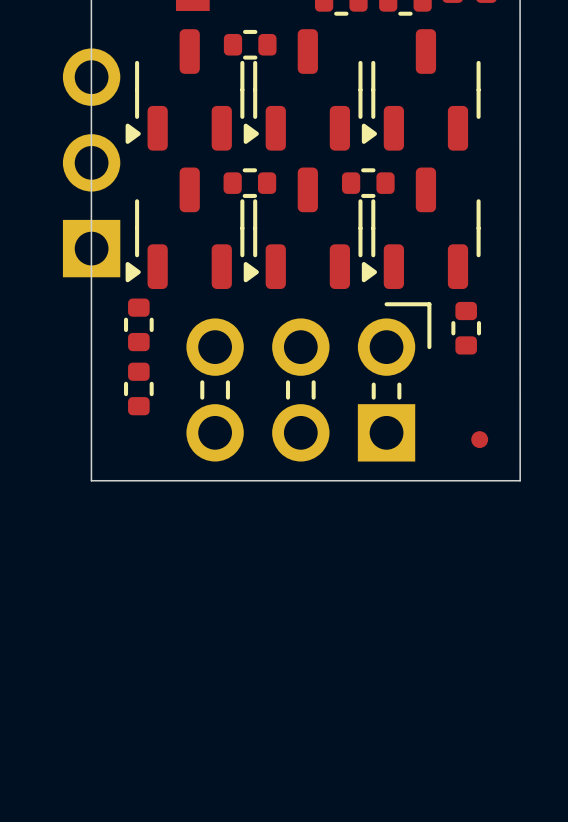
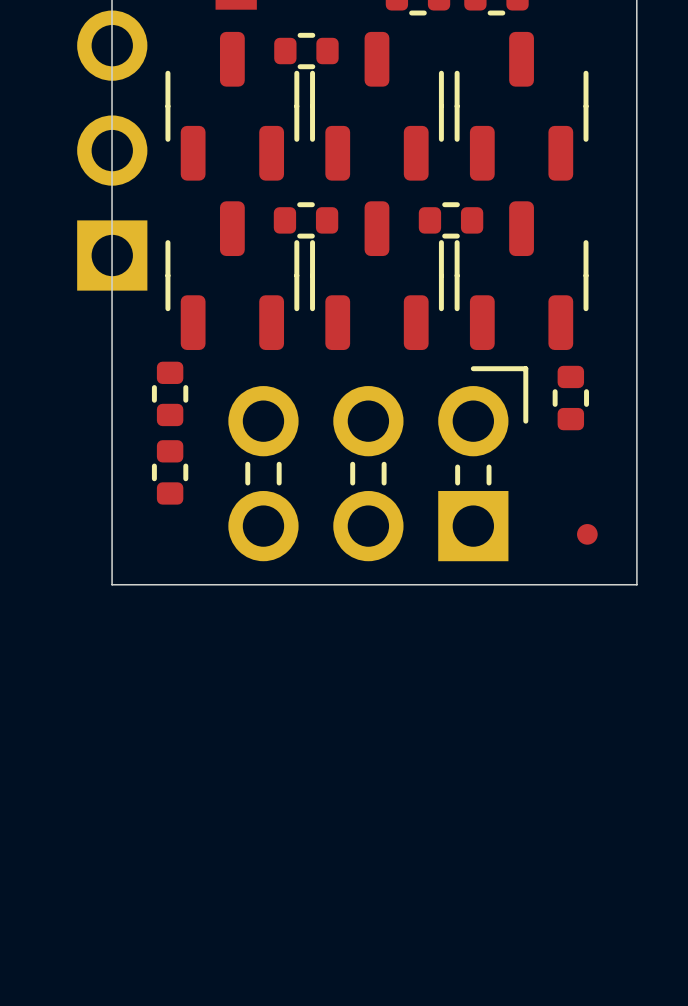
part footprint: [125, 29, 245, 151] -> [165, 31, 300, 181]
part footprint: [243, 29, 363, 151] -> [310, 31, 444, 181]
part footprint: [361, 29, 481, 151] -> [454, 31, 589, 181]
part position: (91, 162) -> (112, 150)
part footprint: [125, 167, 245, 289] -> [165, 201, 300, 351]
part footprint: [243, 167, 363, 289] -> [310, 201, 444, 351]
part footprint: [361, 167, 481, 289] -> [454, 201, 589, 351]

